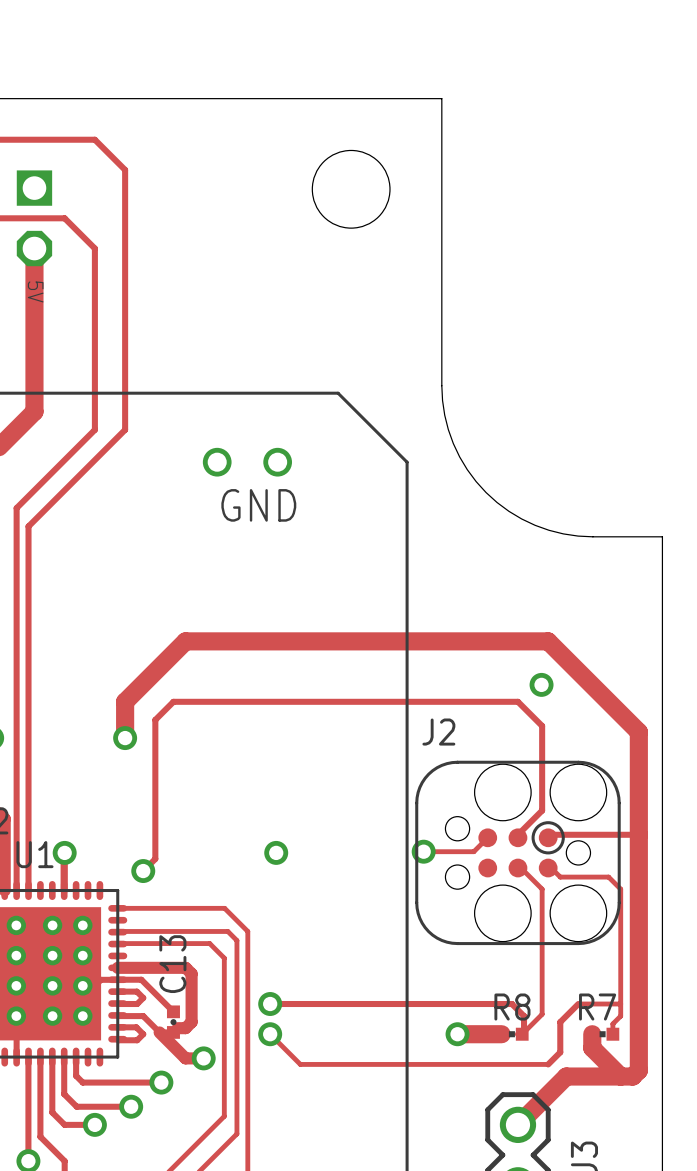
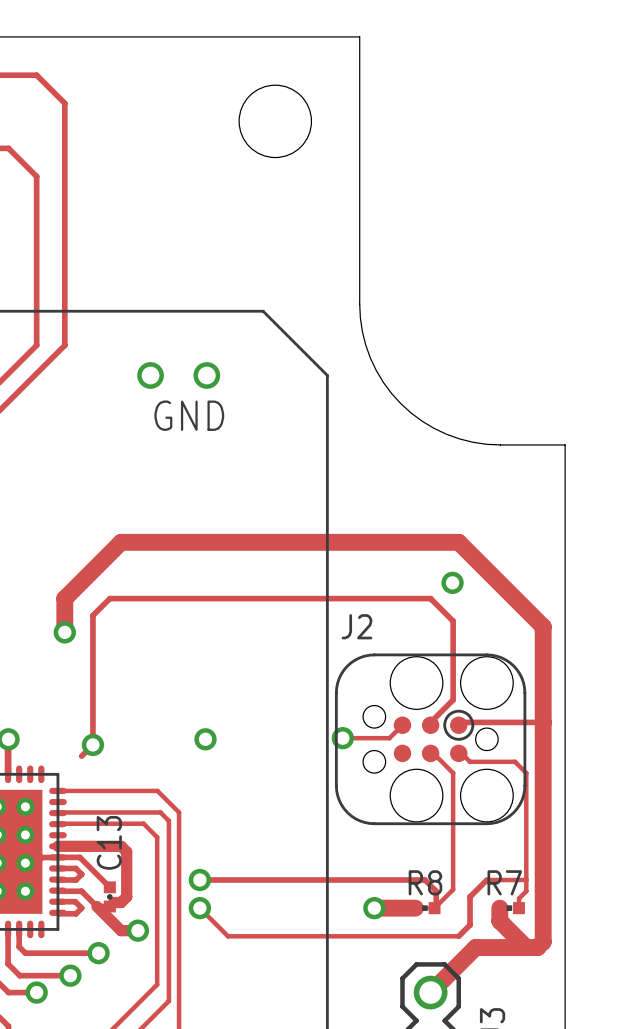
via position: (143, 871) -> (92, 744)

